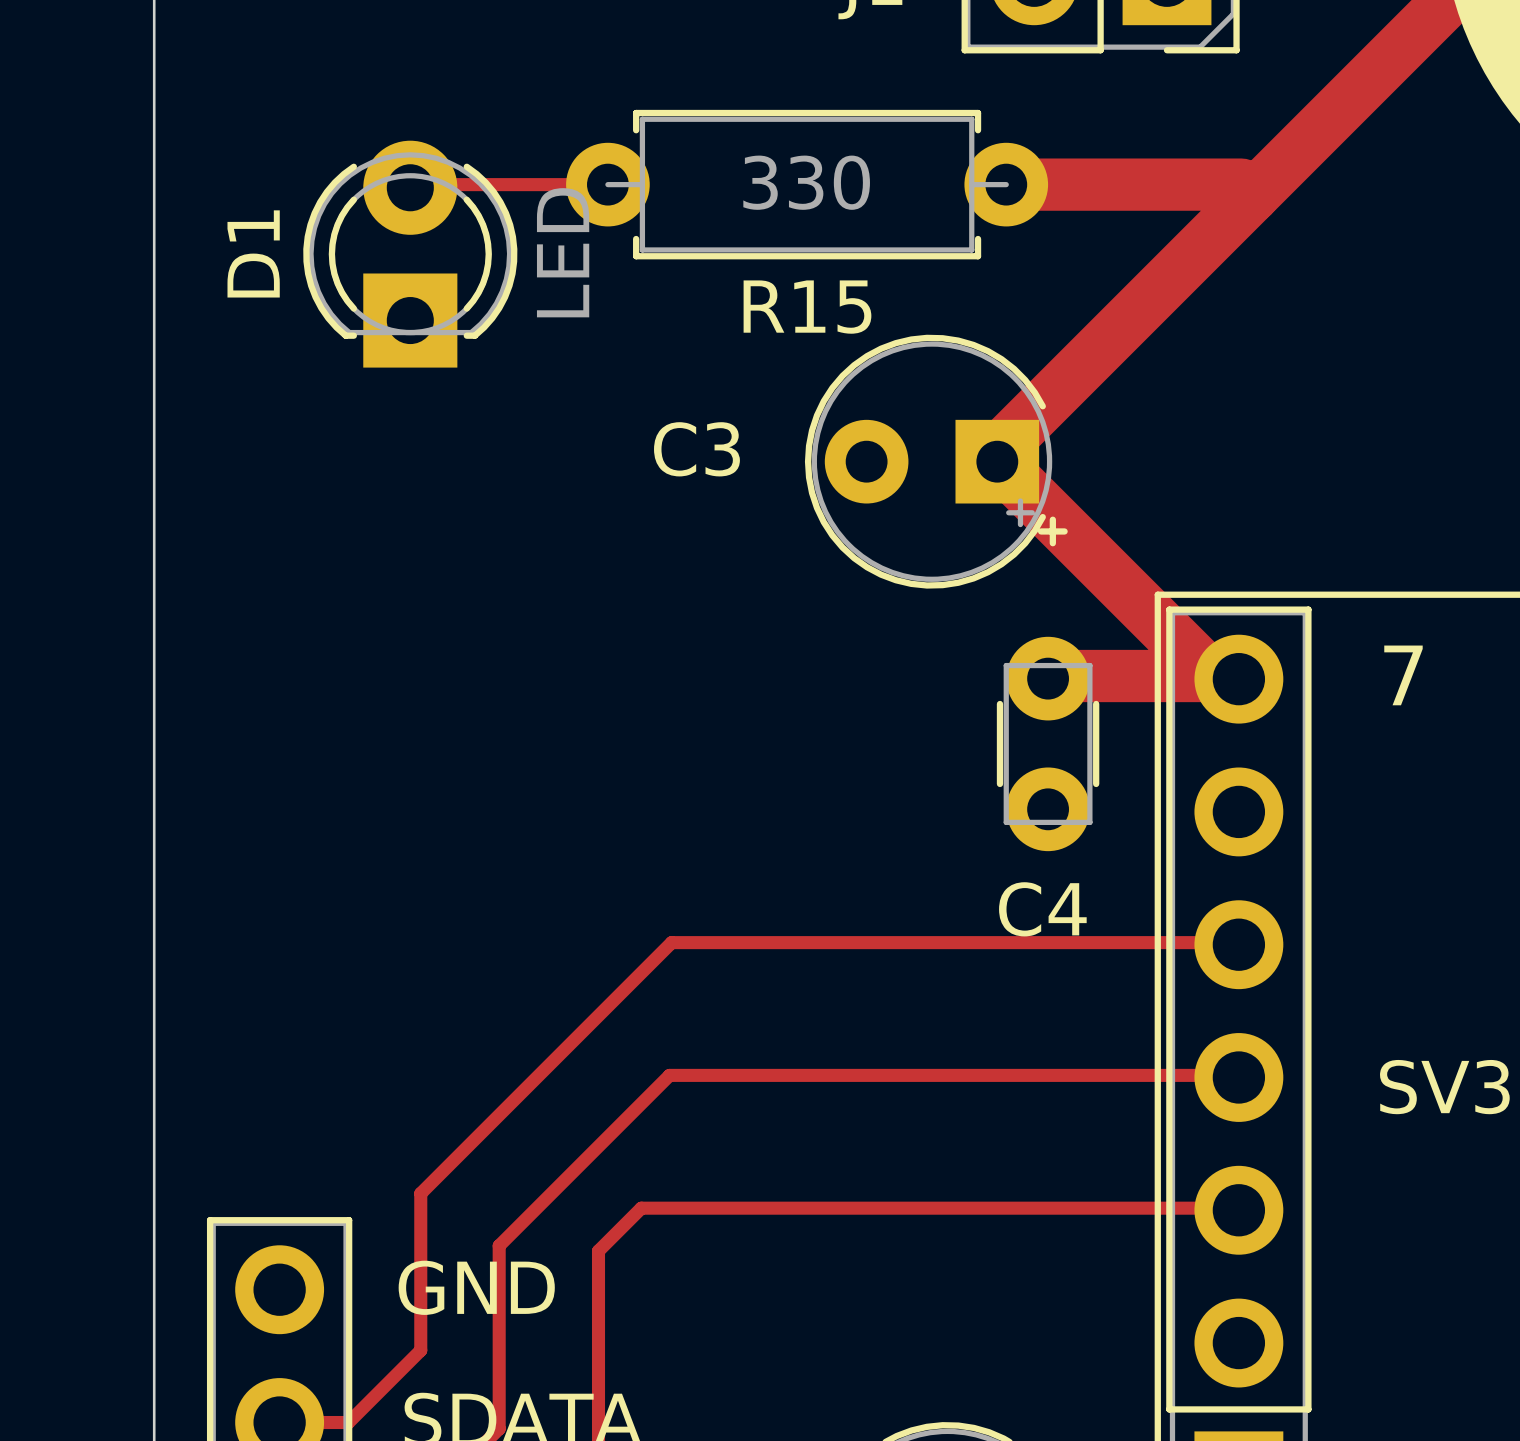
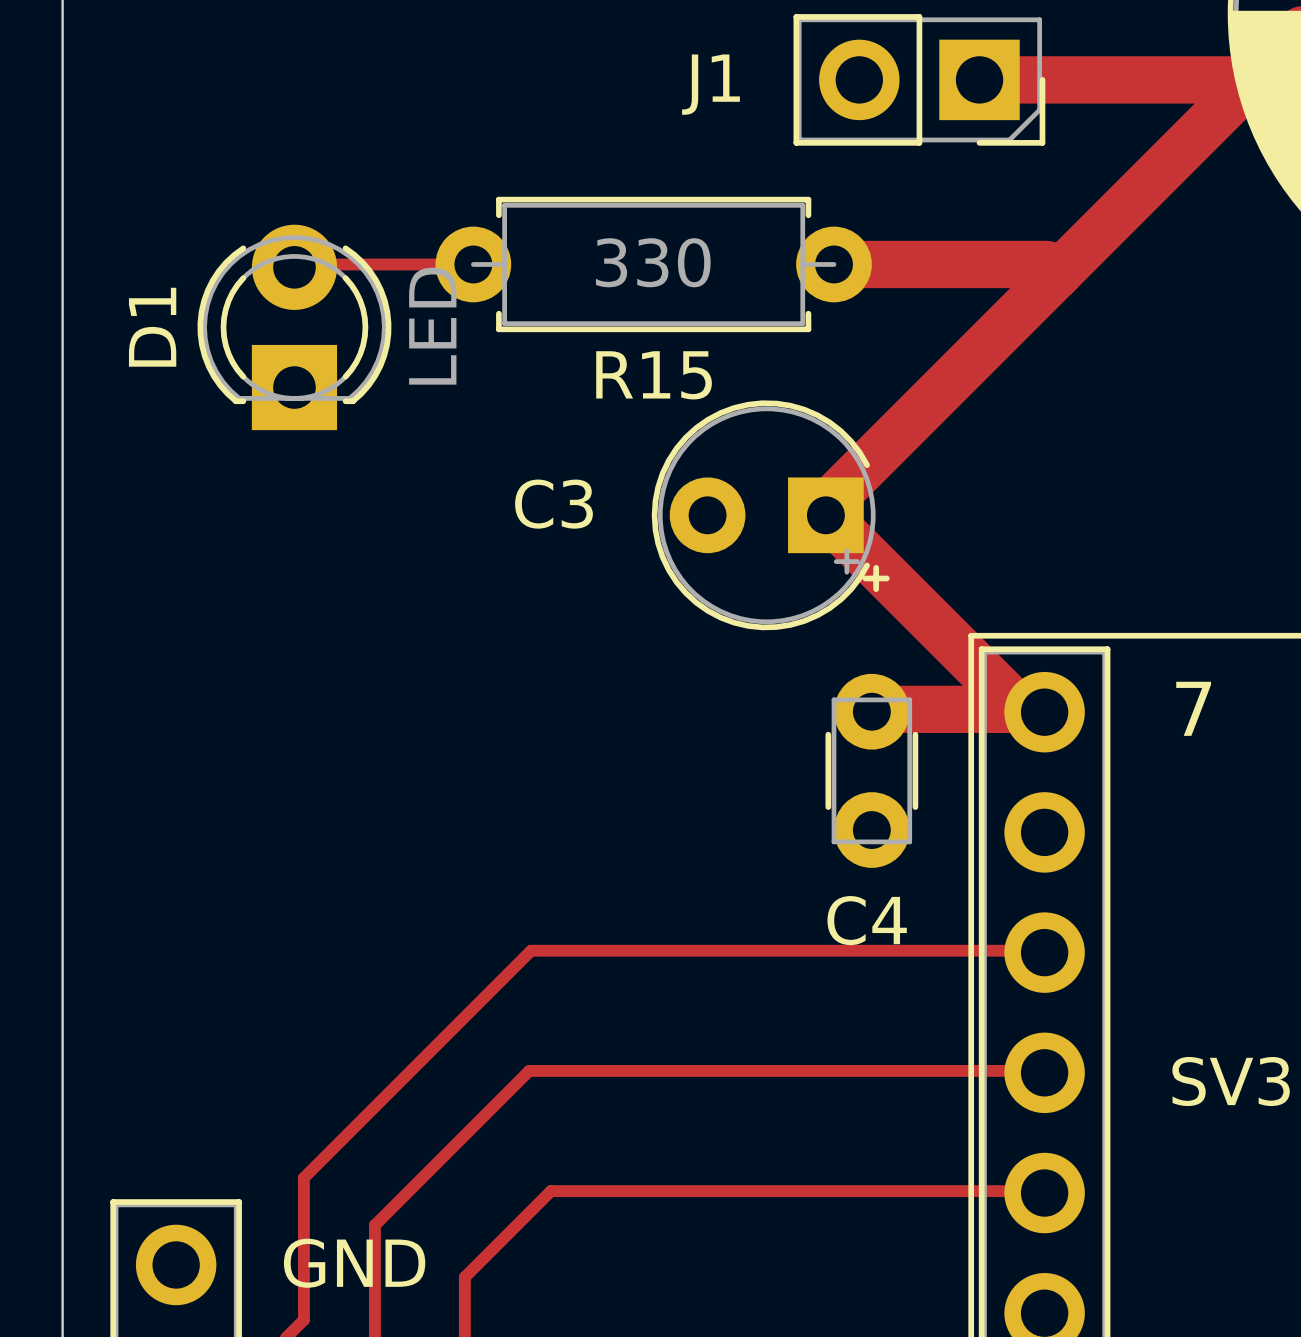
track: (693, 1208) (641, 1208) (598, 1251) (598, 1303) -> (550, 1191) (464, 1277)

